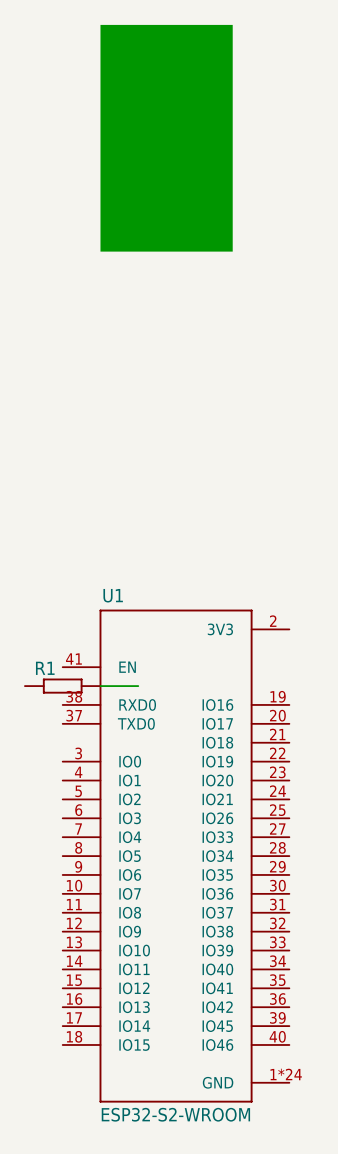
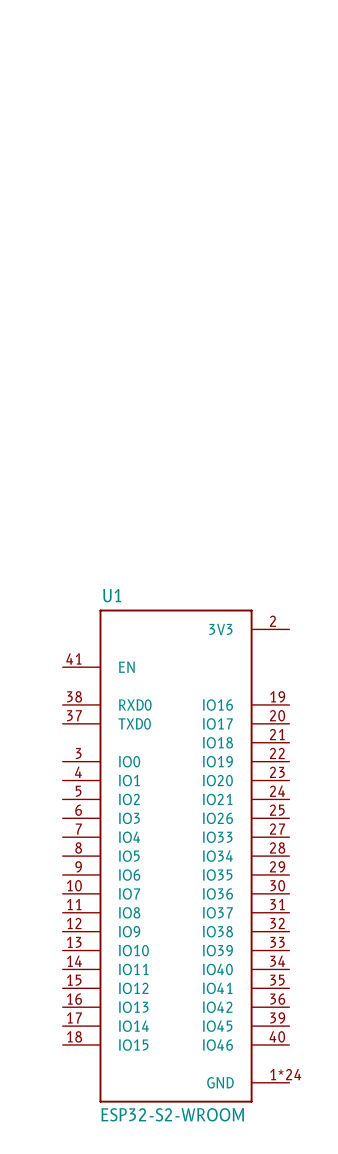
drawing: [100, 24, 233, 252] -> none
R1: (62, 686) -> none
wire: (100, 686) (138, 686) -> none

